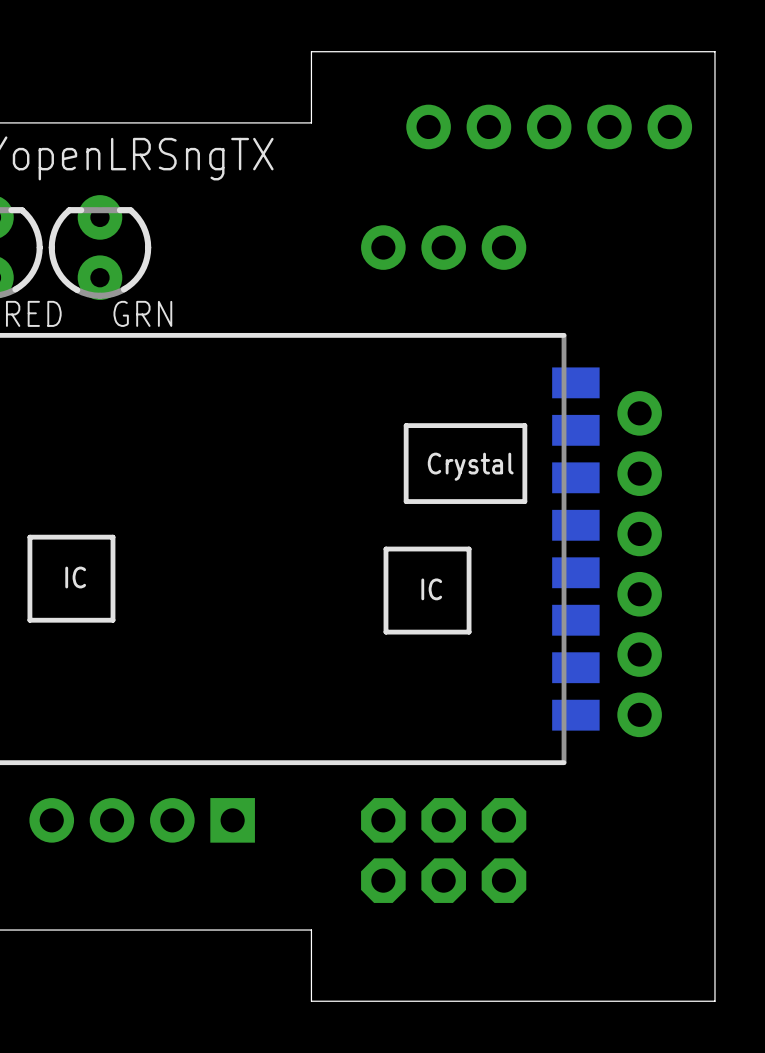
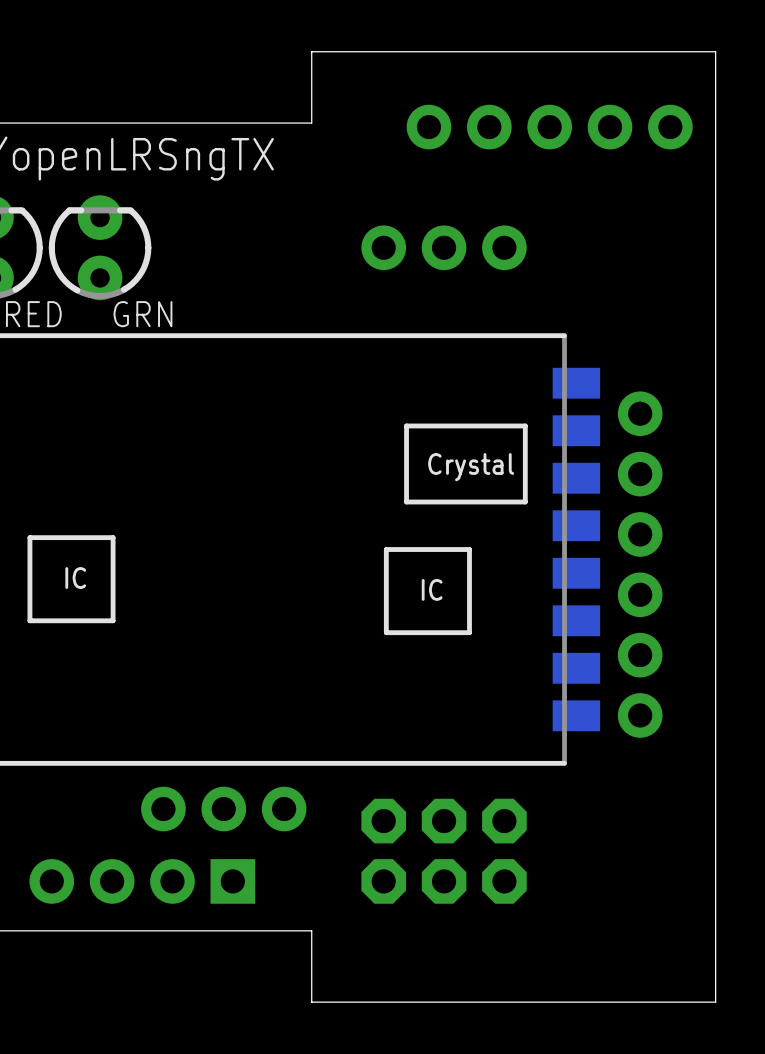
part: none -> (223, 809)
part position: (142, 820) -> (142, 881)

